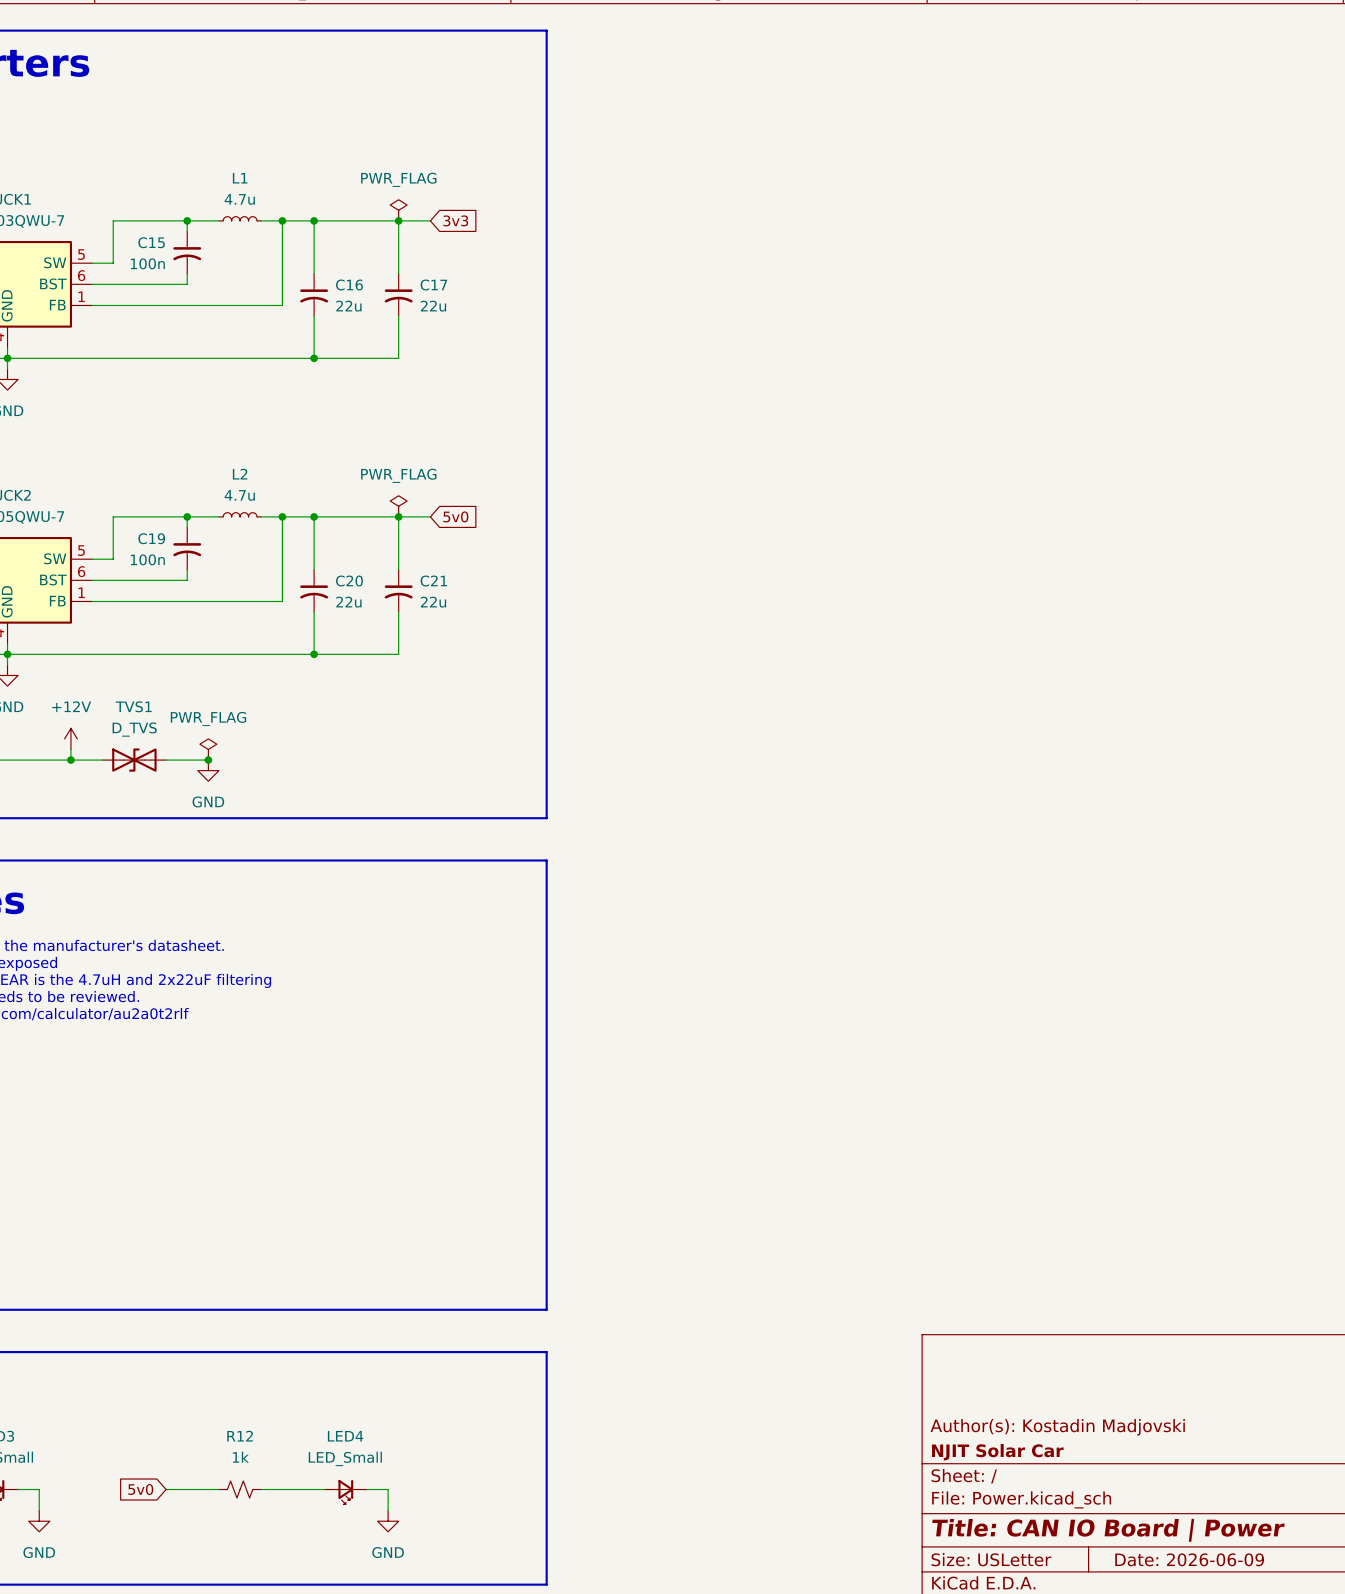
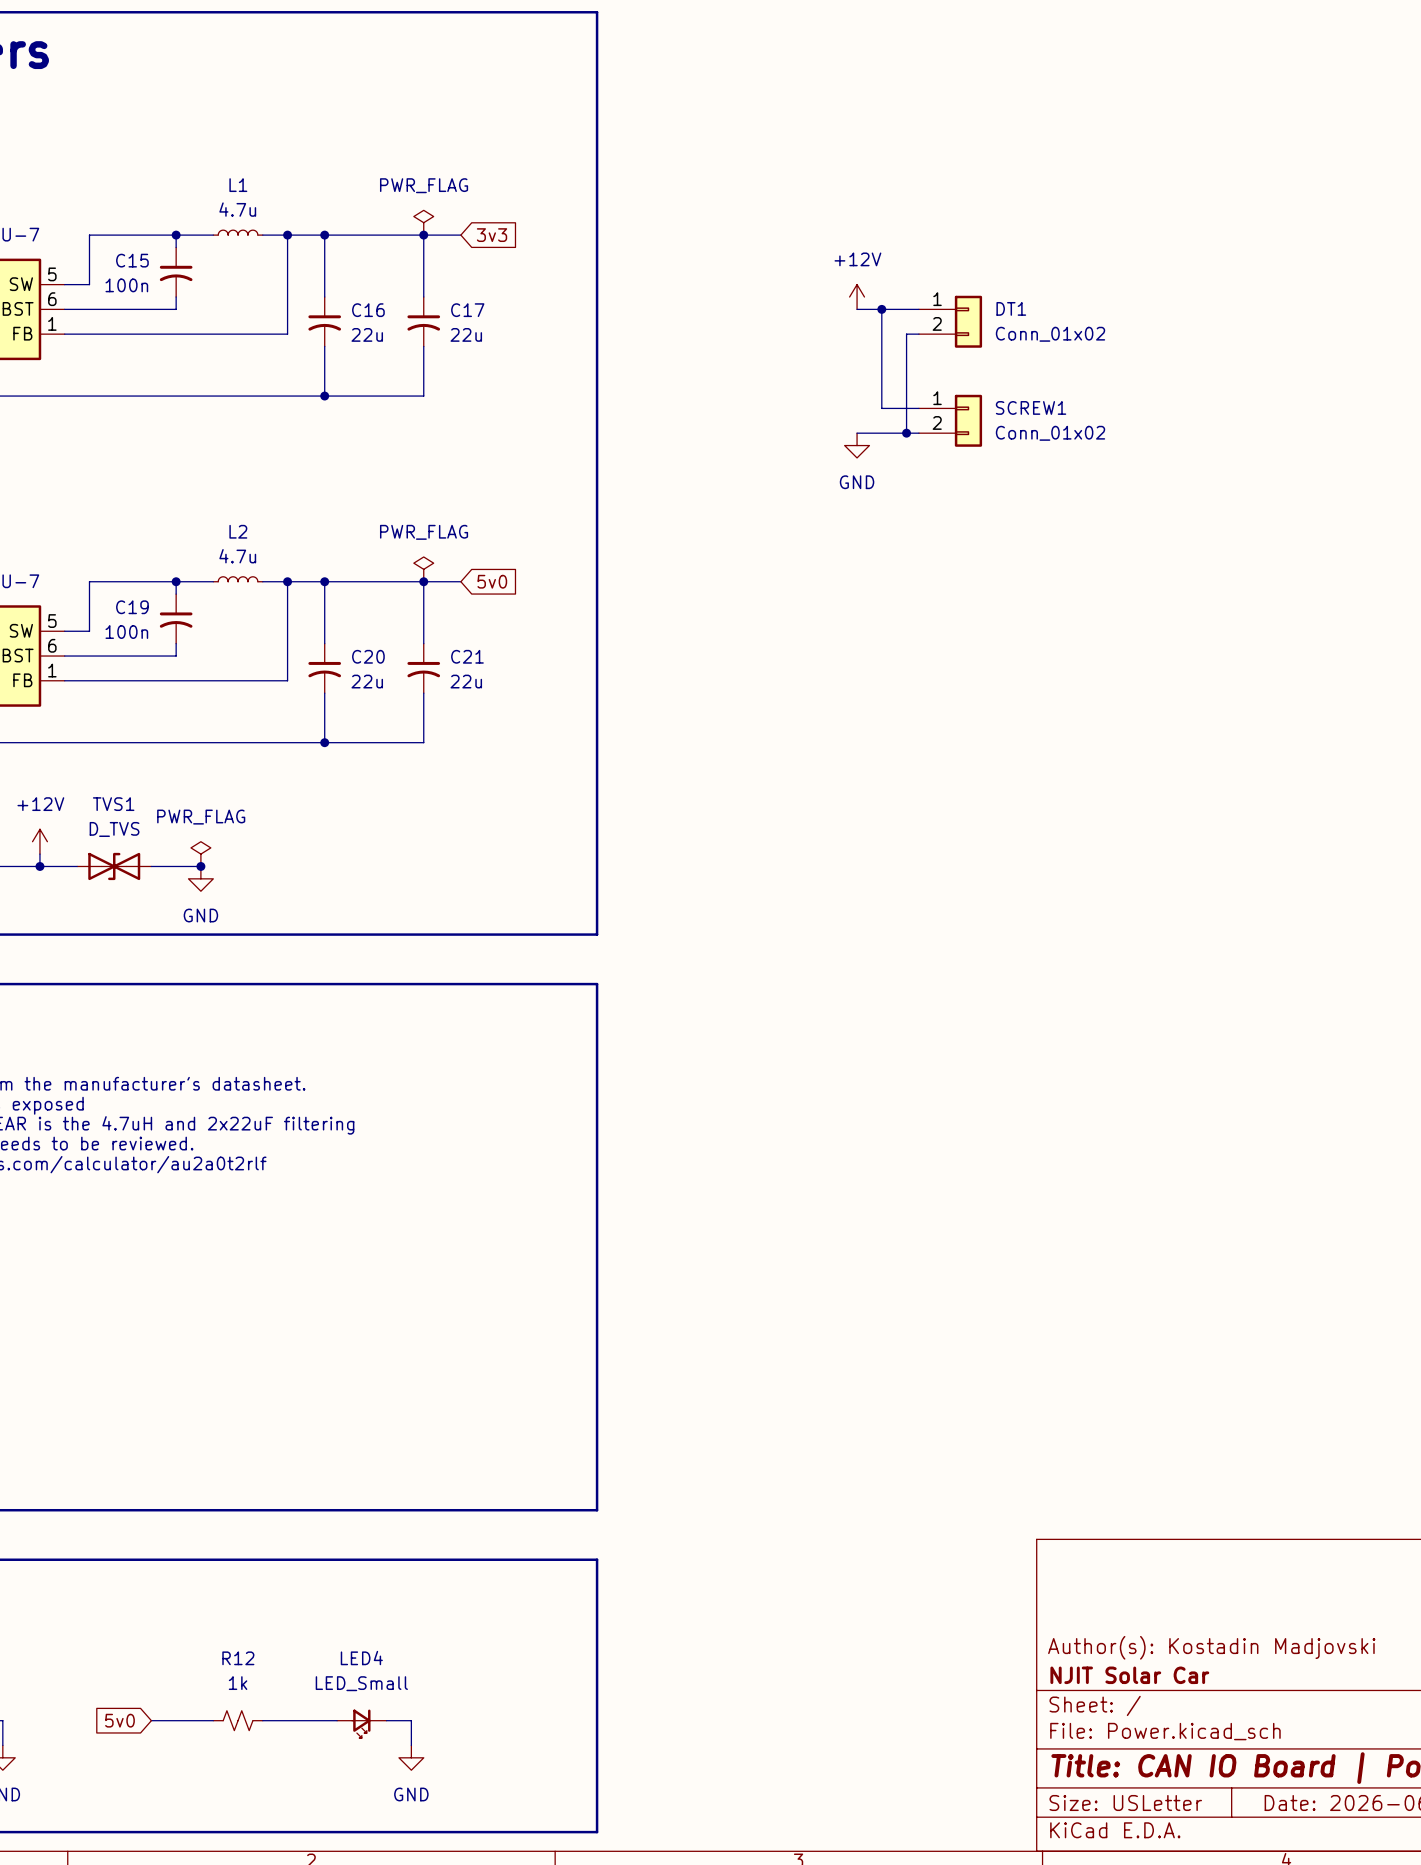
power symbol: none -> +12V (857, 297)
wire: none -> (857, 309) (918, 309)
wire: none -> (881, 309) (881, 408) (918, 408)
junction: none -> (881, 309)
DT1: none -> Conn_01x02 (950, 321)
wire: none -> (918, 334) (906, 334) (906, 433)
SCREW1: none -> Conn_01x02 (950, 420)
wire: none -> (857, 433) (918, 433)
junction: none -> (906, 433)
power symbol: none -> GND (857, 445)

